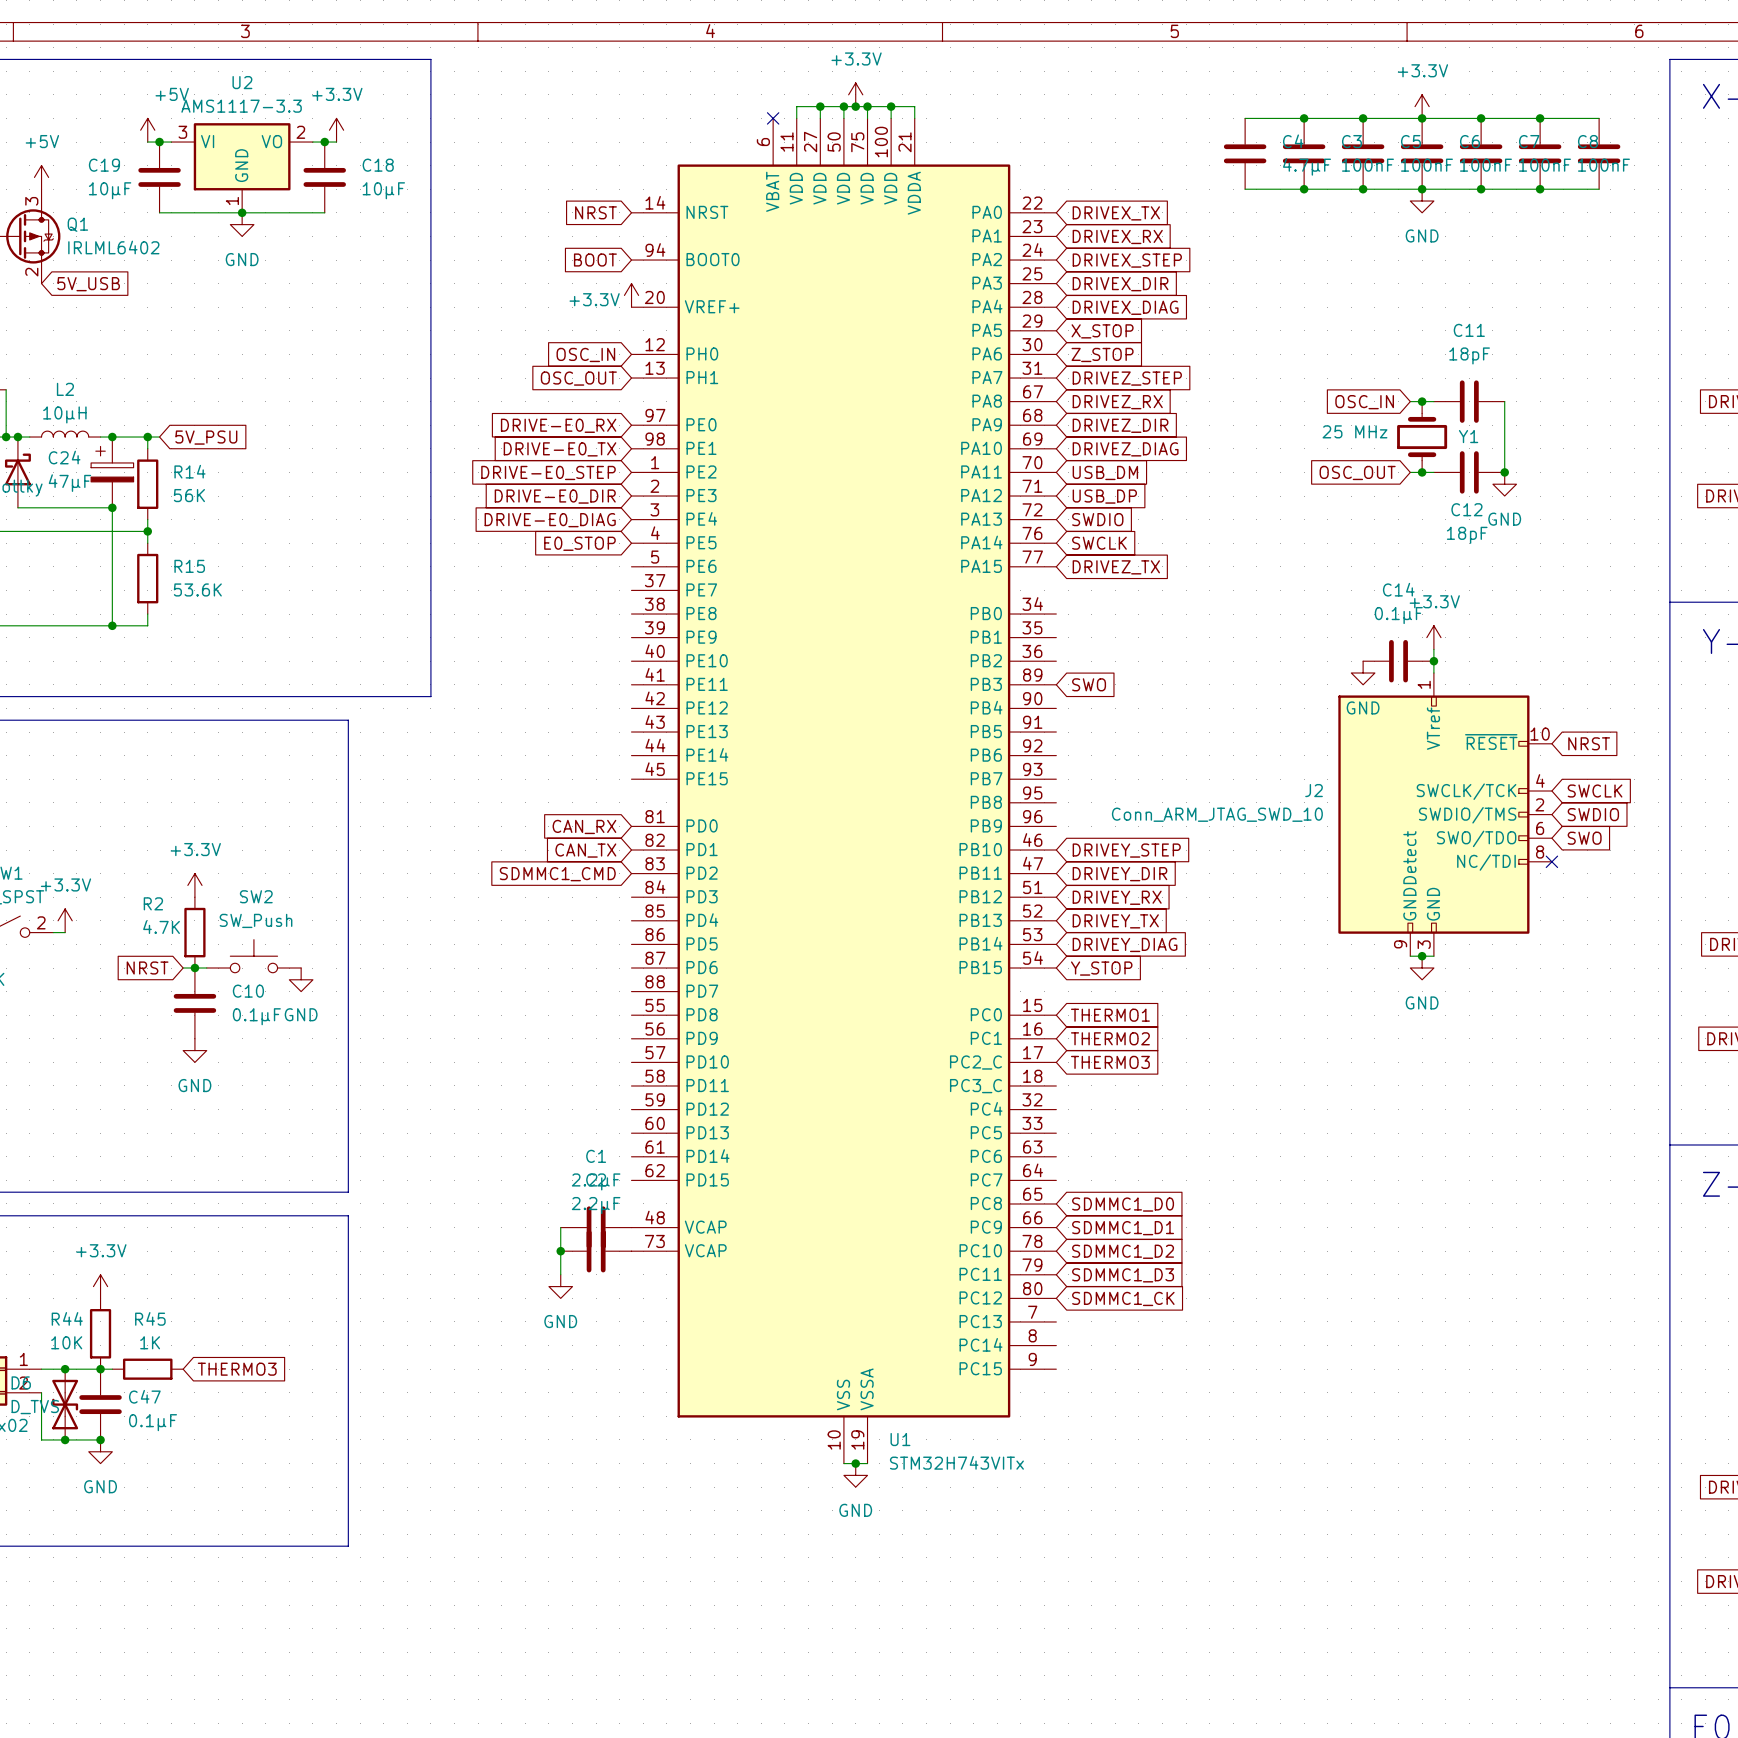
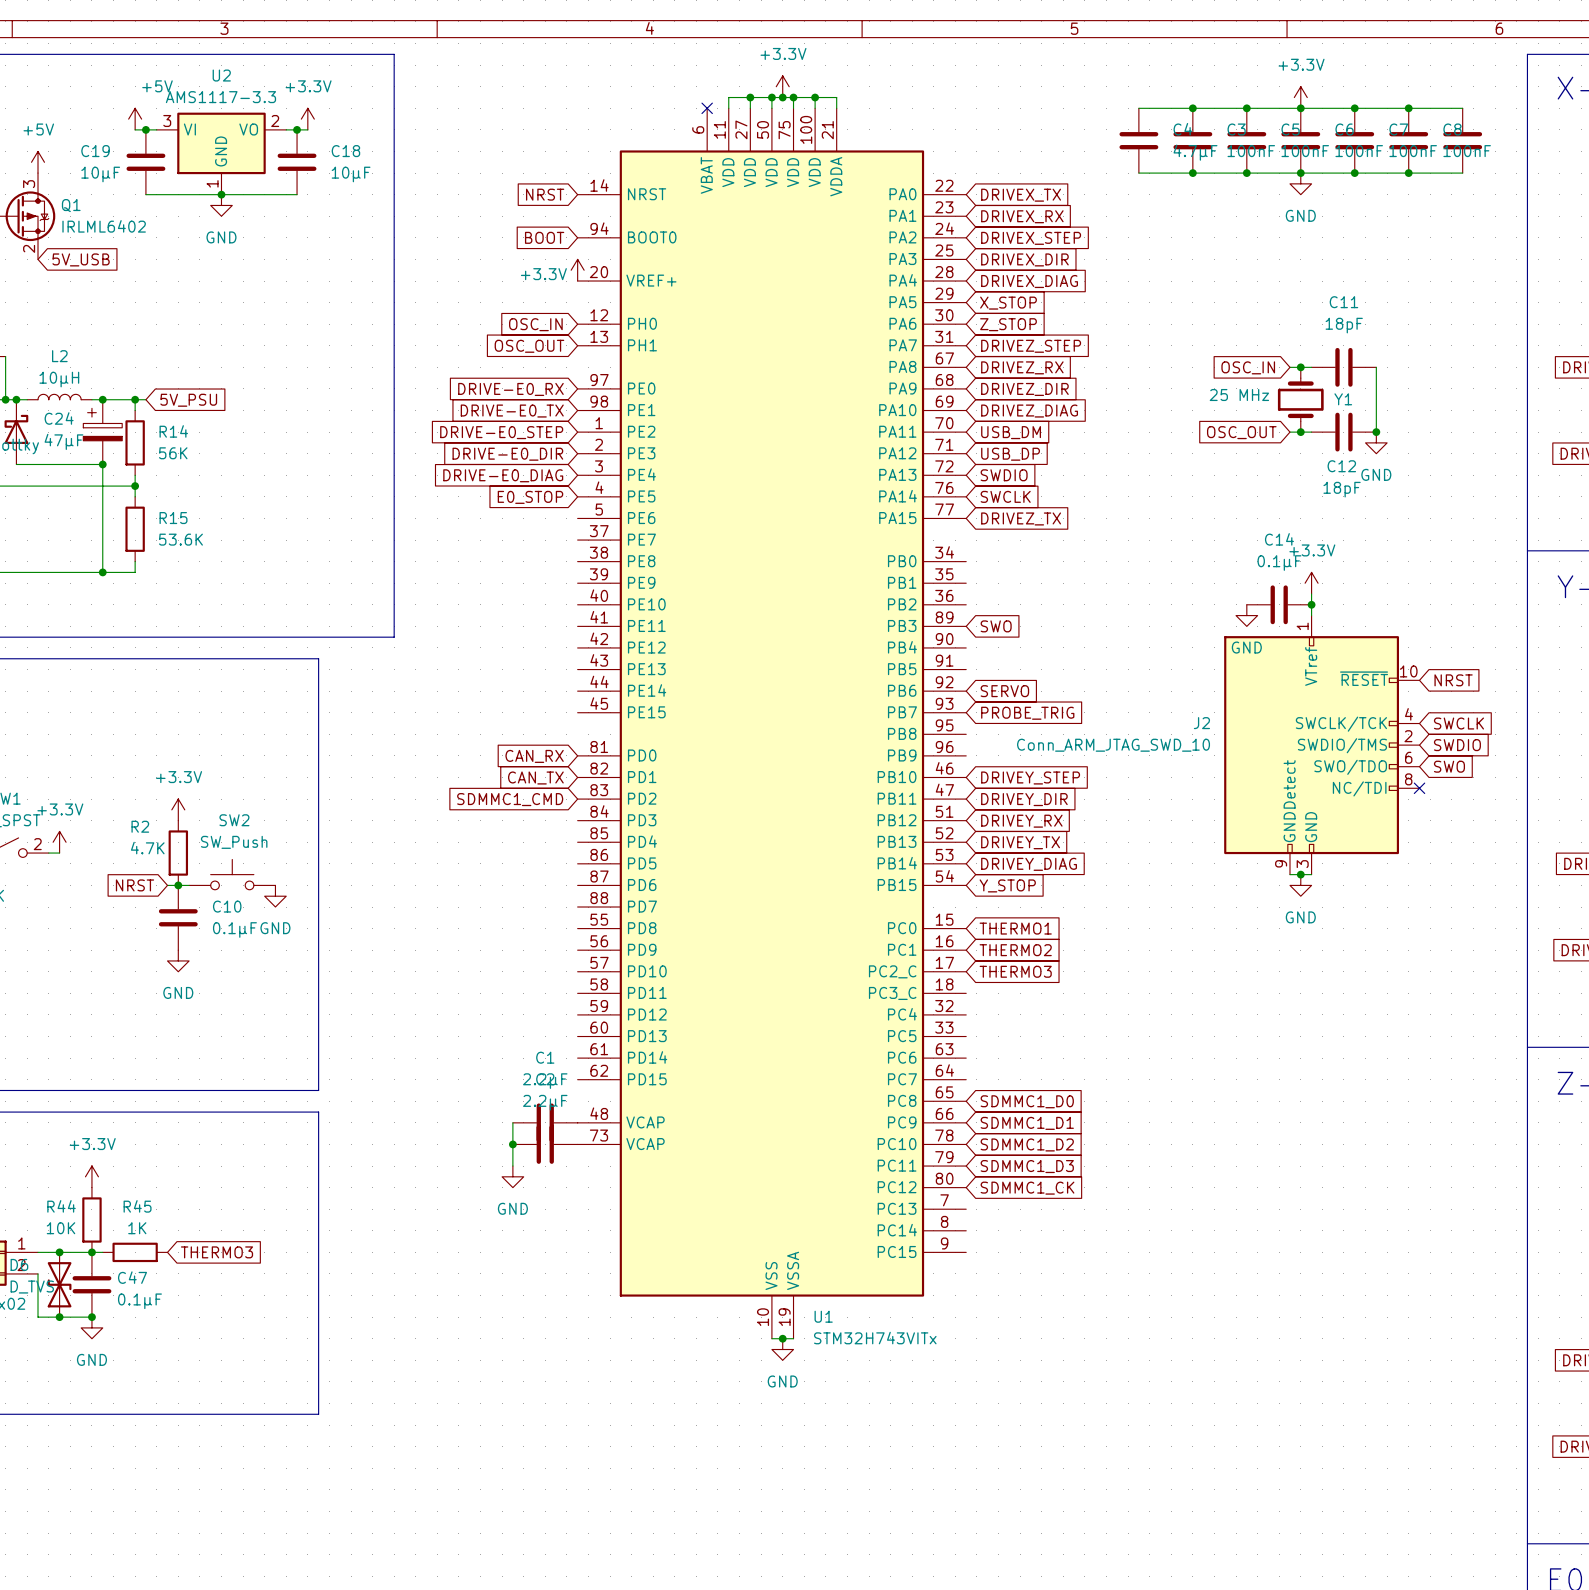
global label: none -> SERVO (1004, 691)
global label: none -> PROBE_TRIG (1027, 713)

